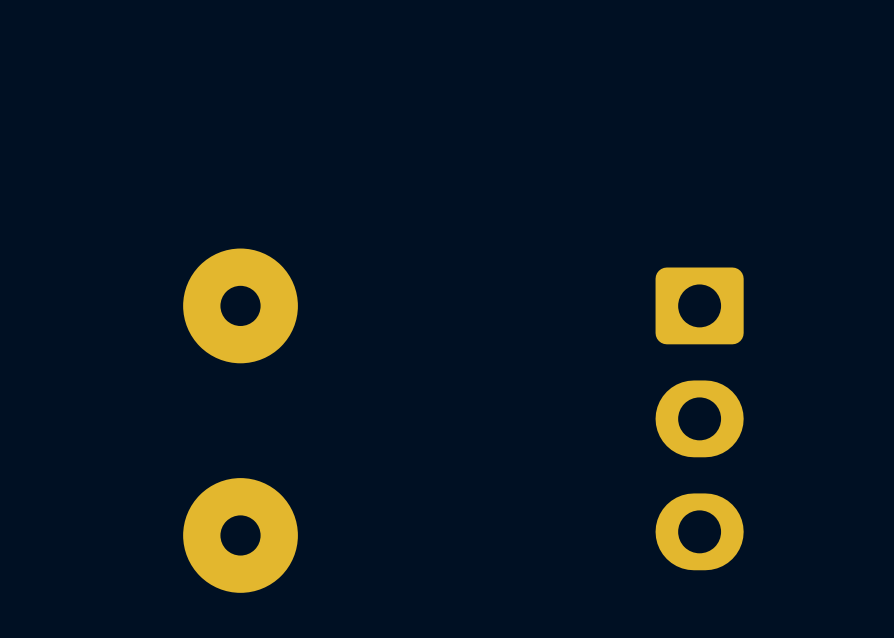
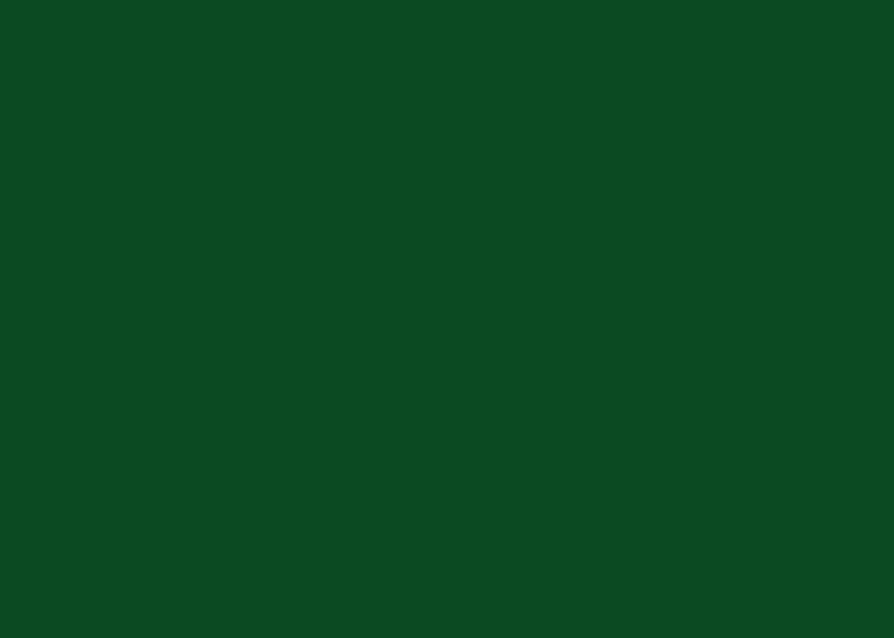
part: (240, 305) -> none
part: (699, 418) -> none
part: (240, 535) -> none

